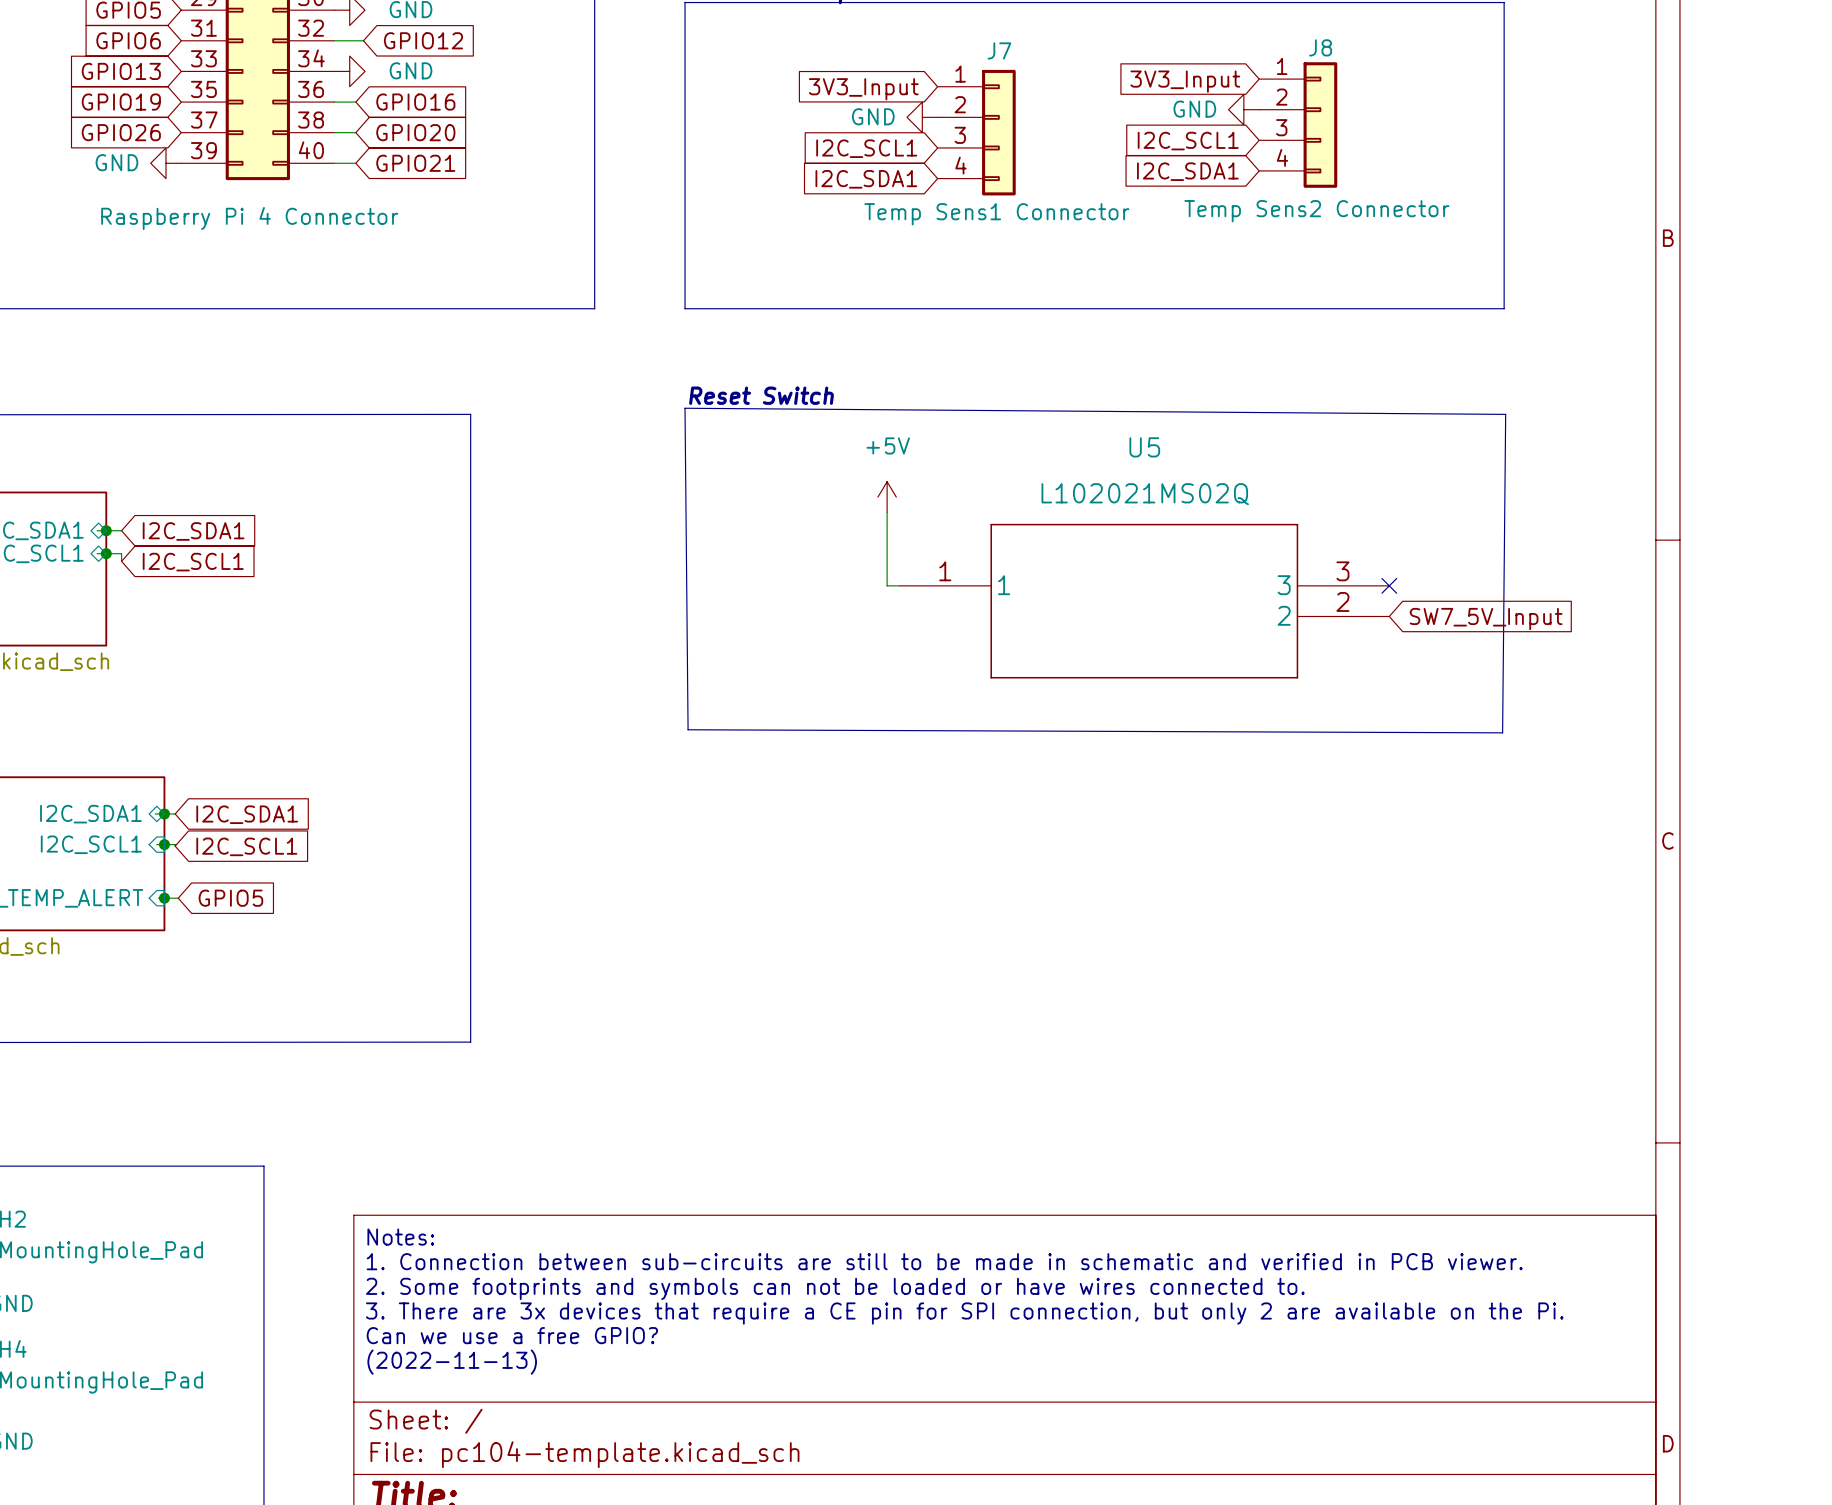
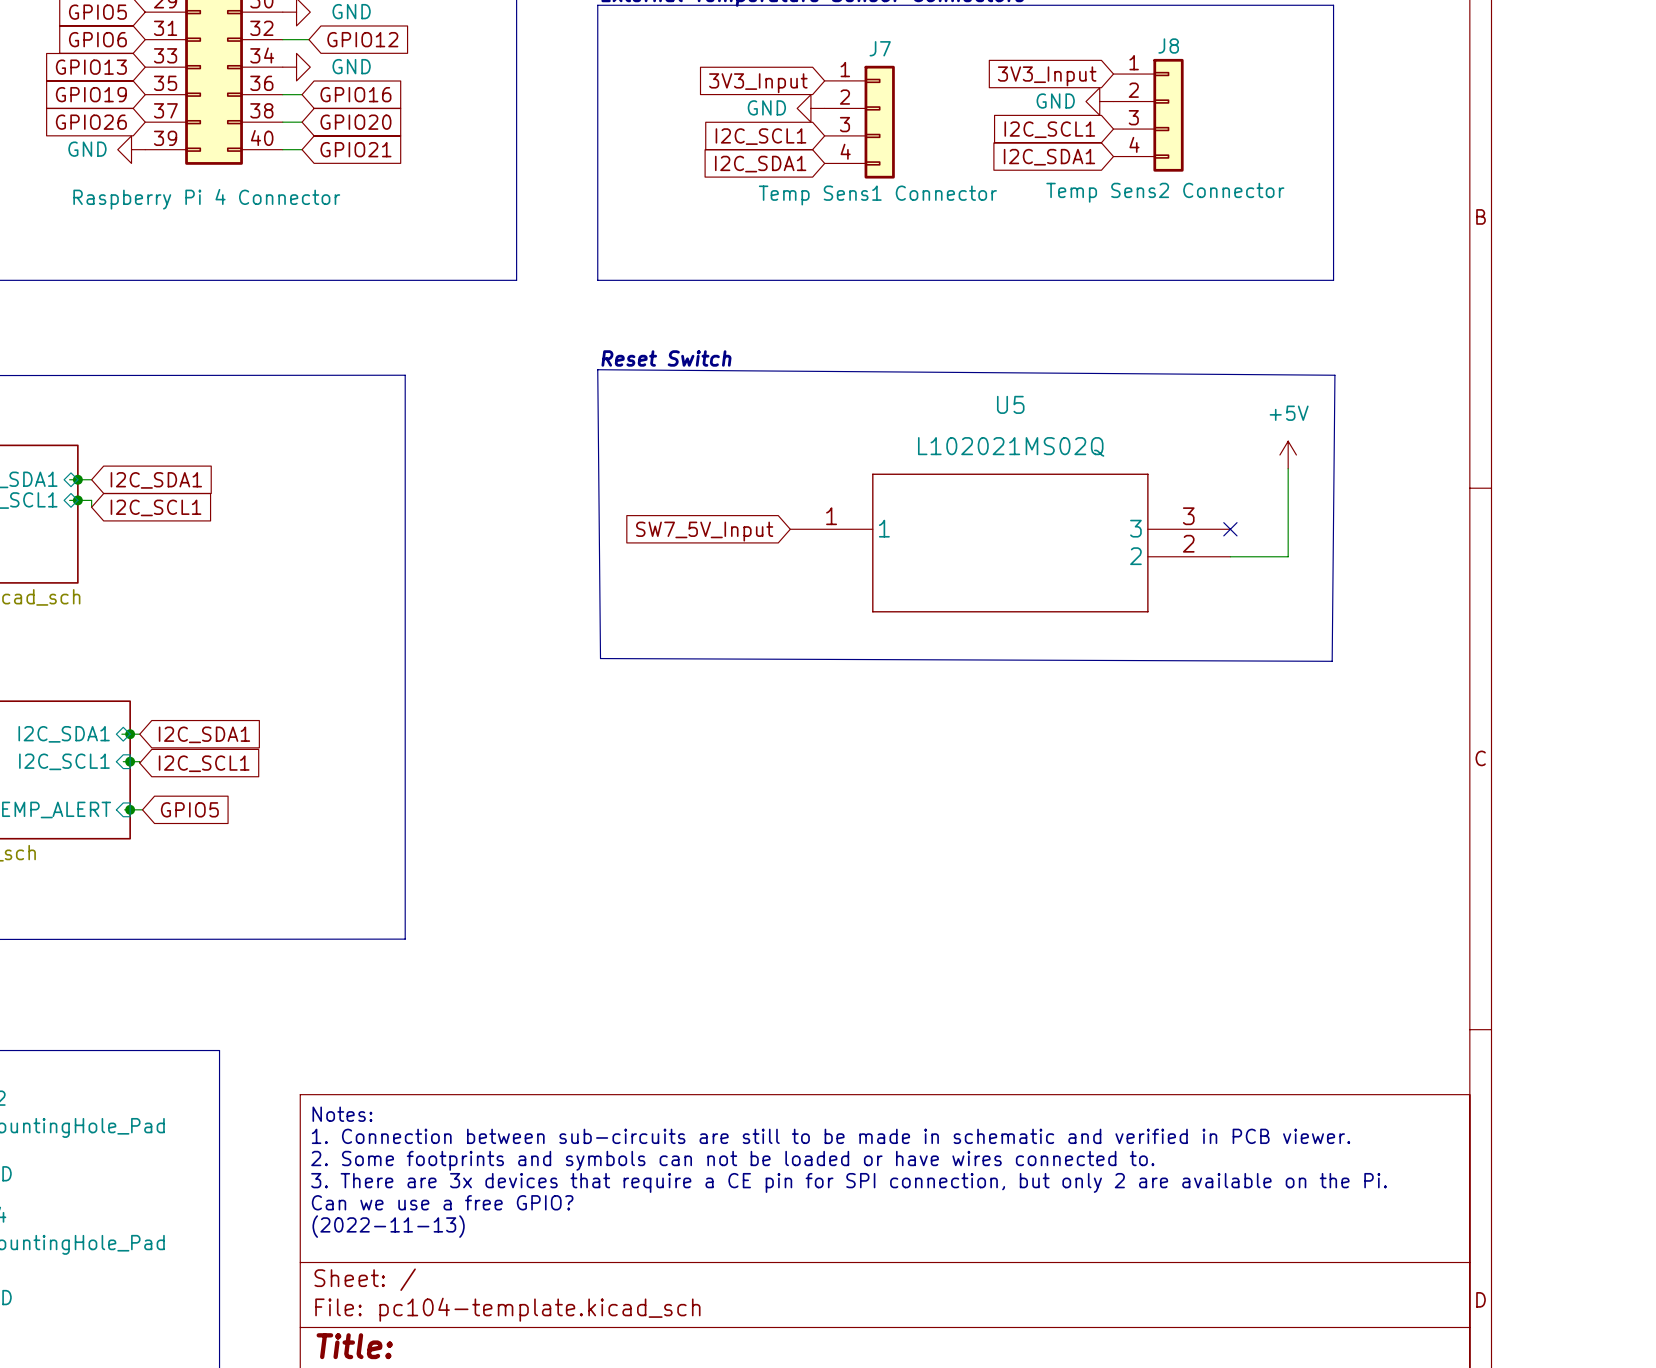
power symbol: +5V (887, 497) -> none
power symbol: none -> +5V (1288, 455)
wire: (887, 512) (887, 585) (899, 585) -> none
wire: none -> (1288, 468) (1288, 556) (1230, 556)
global label: none -> SW7_5V_Input (704, 531)
global label: SW7_5V_Input (1486, 619) -> none

